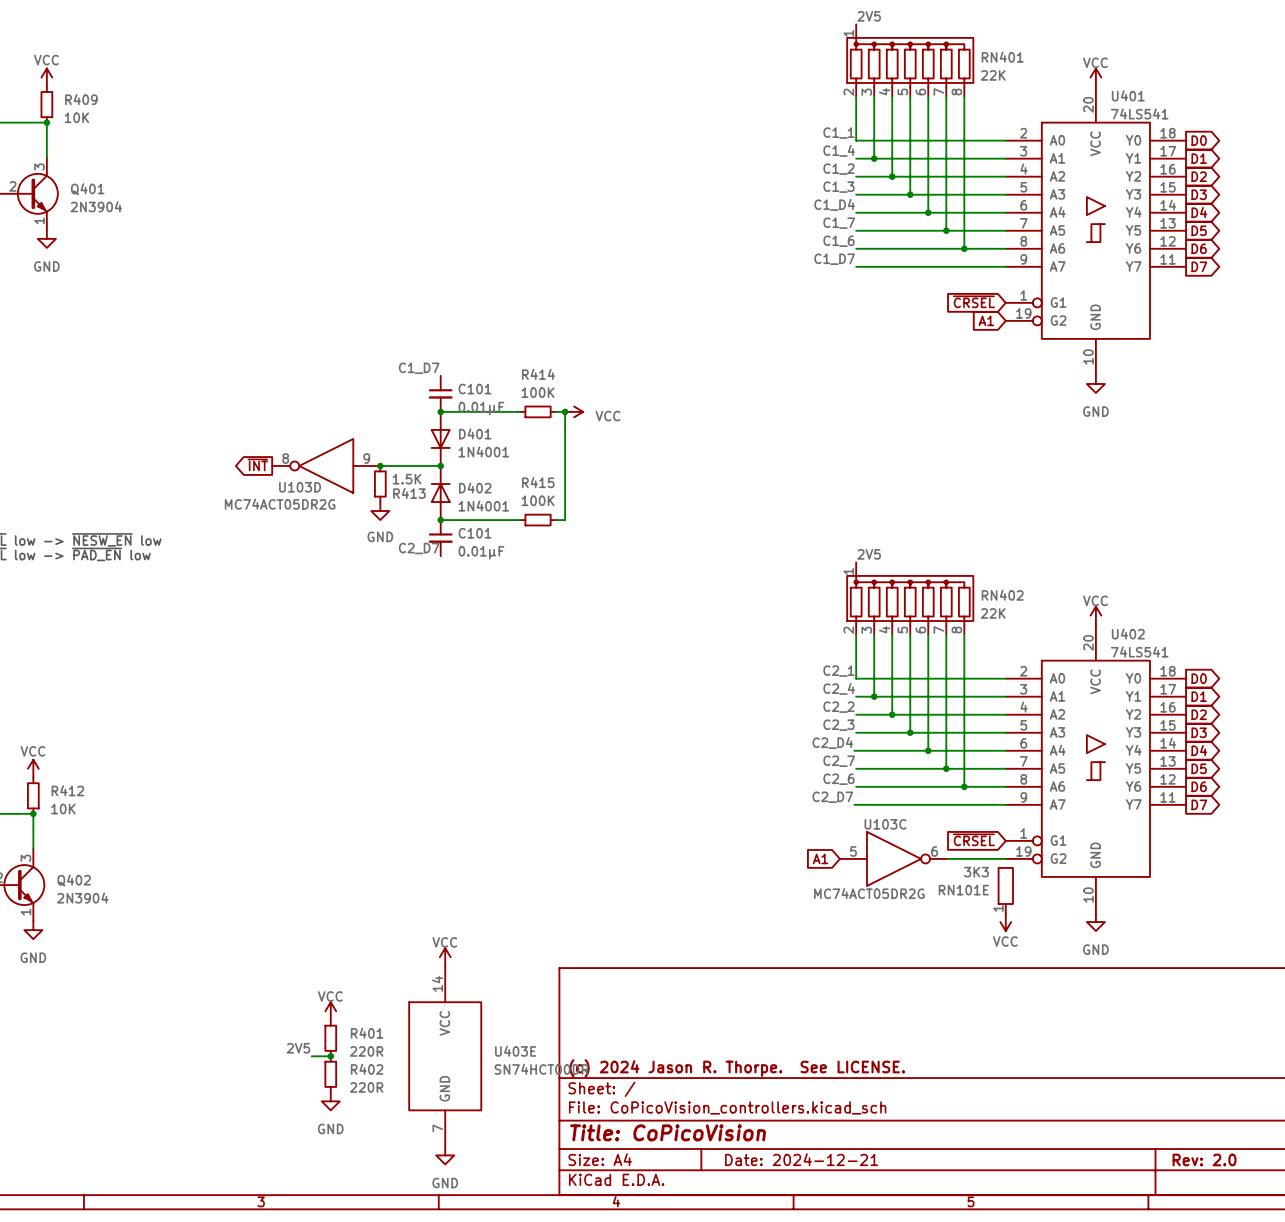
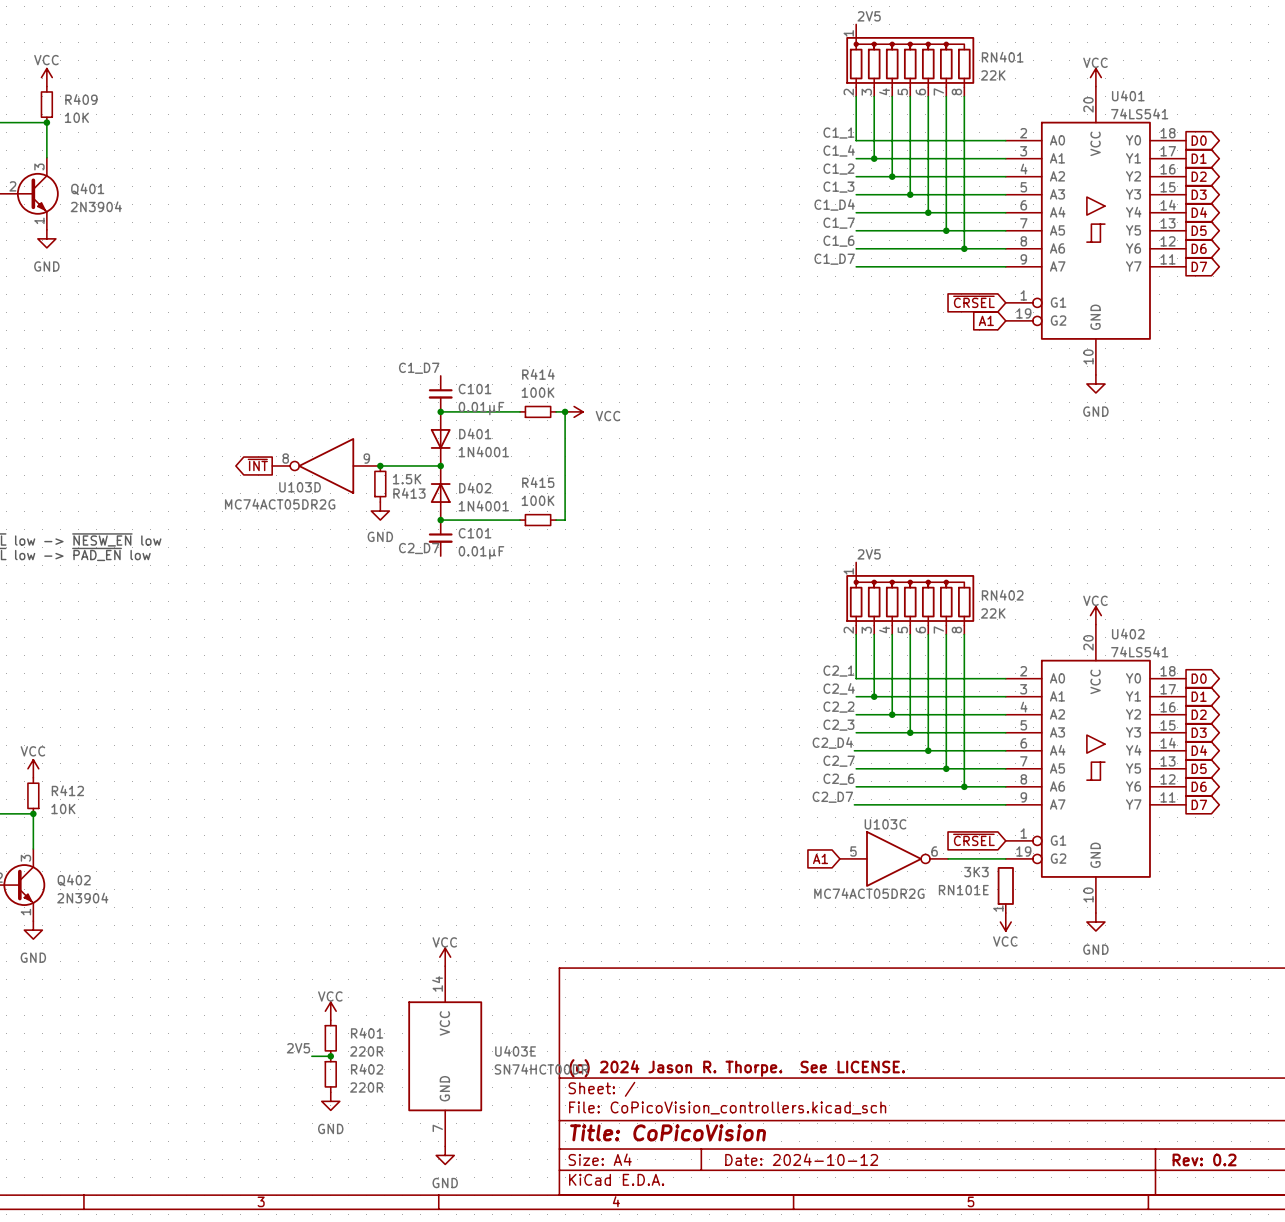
title block: Date: 2024-12-21 (801, 1159) -> Date: 2024-10-12 (801, 1159)
title block: Rev: 2.0 (1204, 1159) -> Rev: 0.2 (1204, 1159)

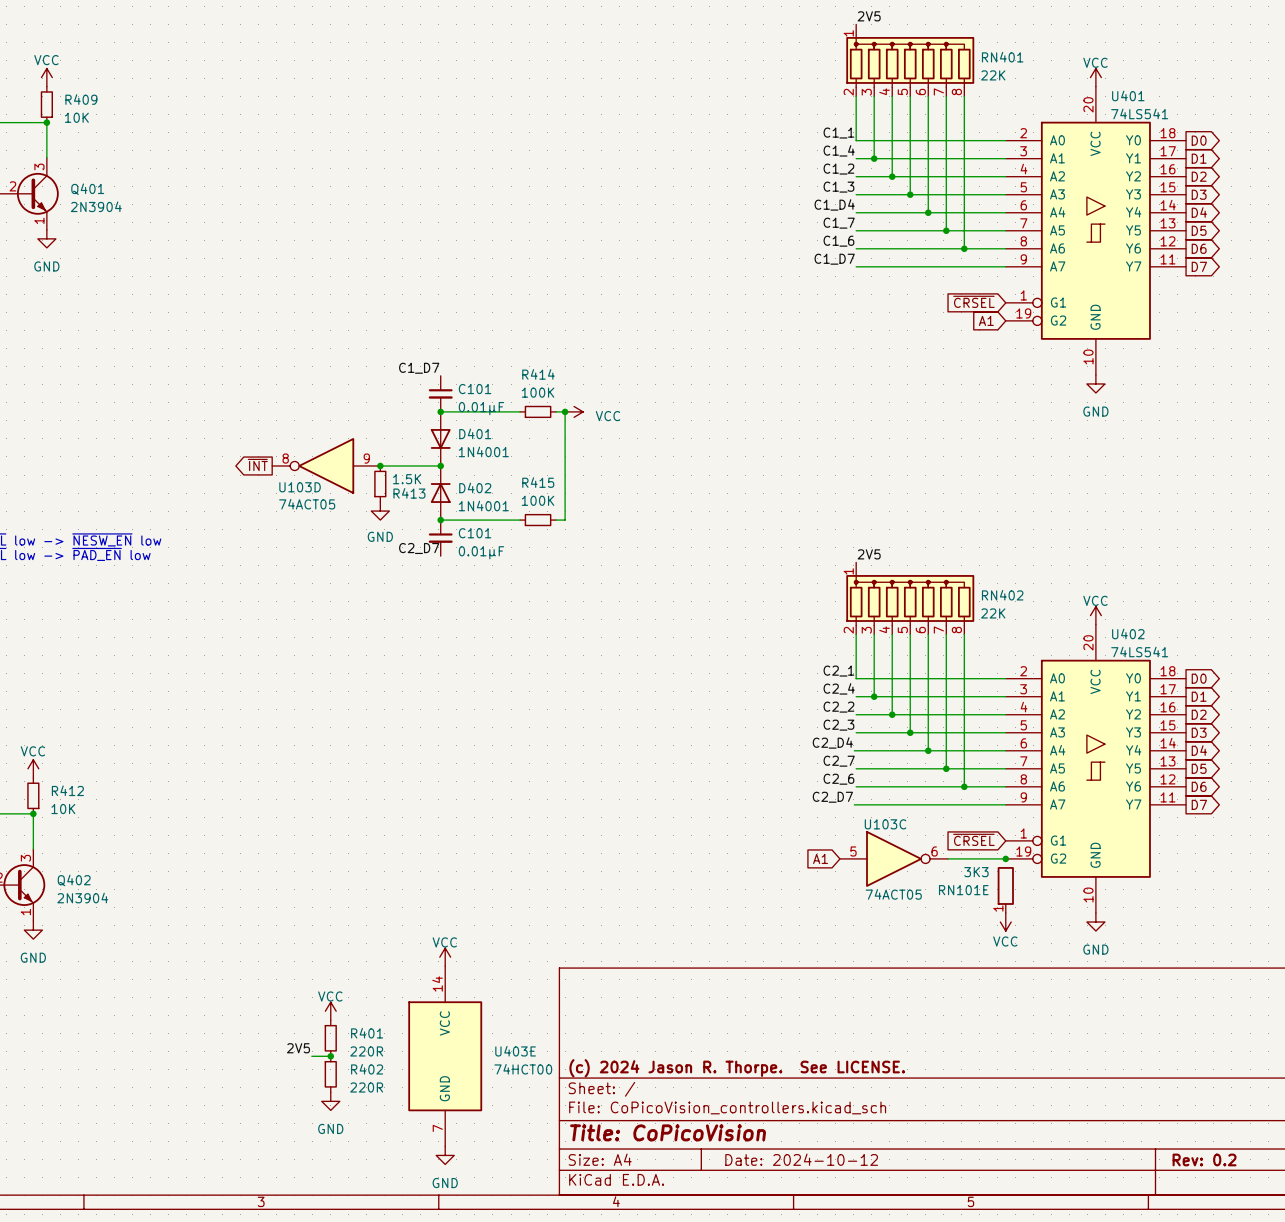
U103D value: MC74ACT05DR2G (280, 504) -> 74ACT05 (307, 504)
junction: none -> (1005, 858)
U103C value: MC74ACT05DR2G (869, 893) -> 74ACT05 (893, 894)
U403E value: SN74HCT00DR (541, 1069) -> 74HCT00 (523, 1069)

